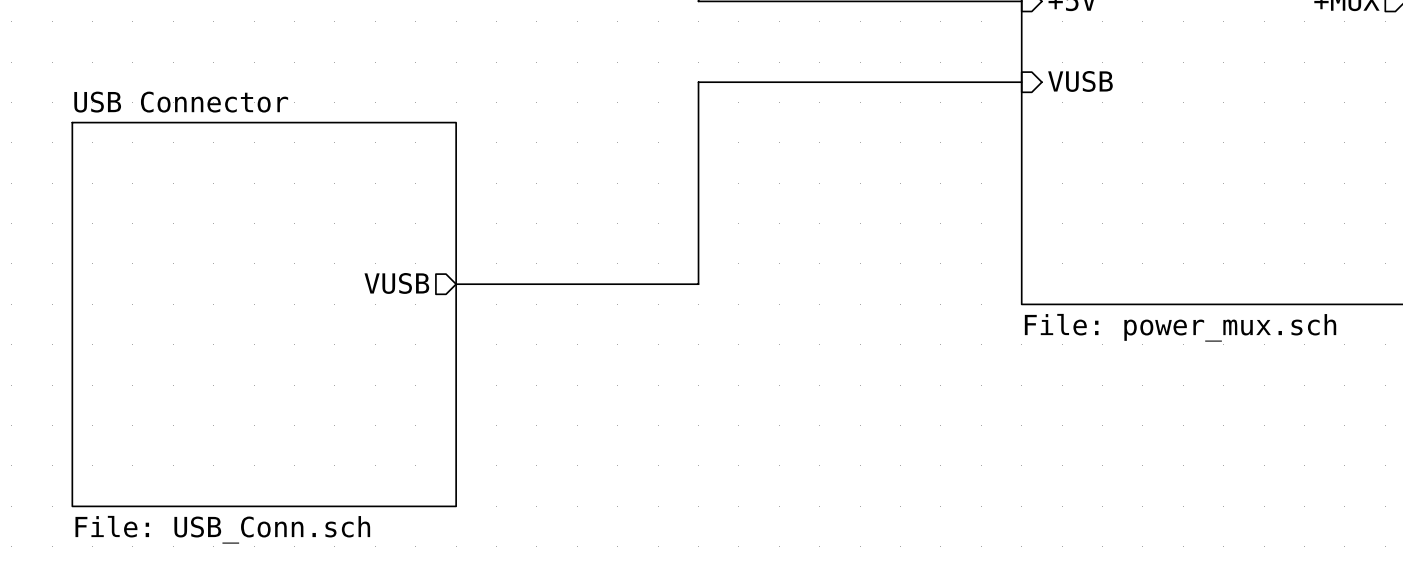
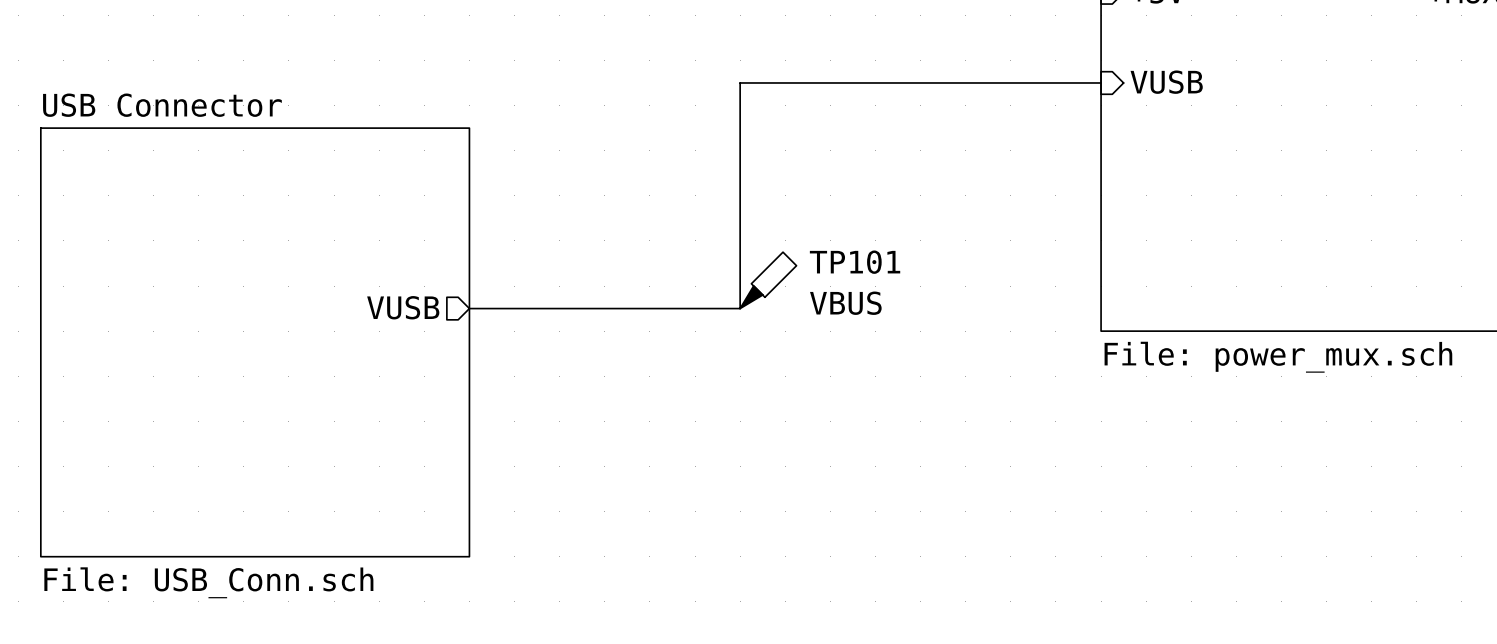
TP101: none -> VBUS (768, 280)

